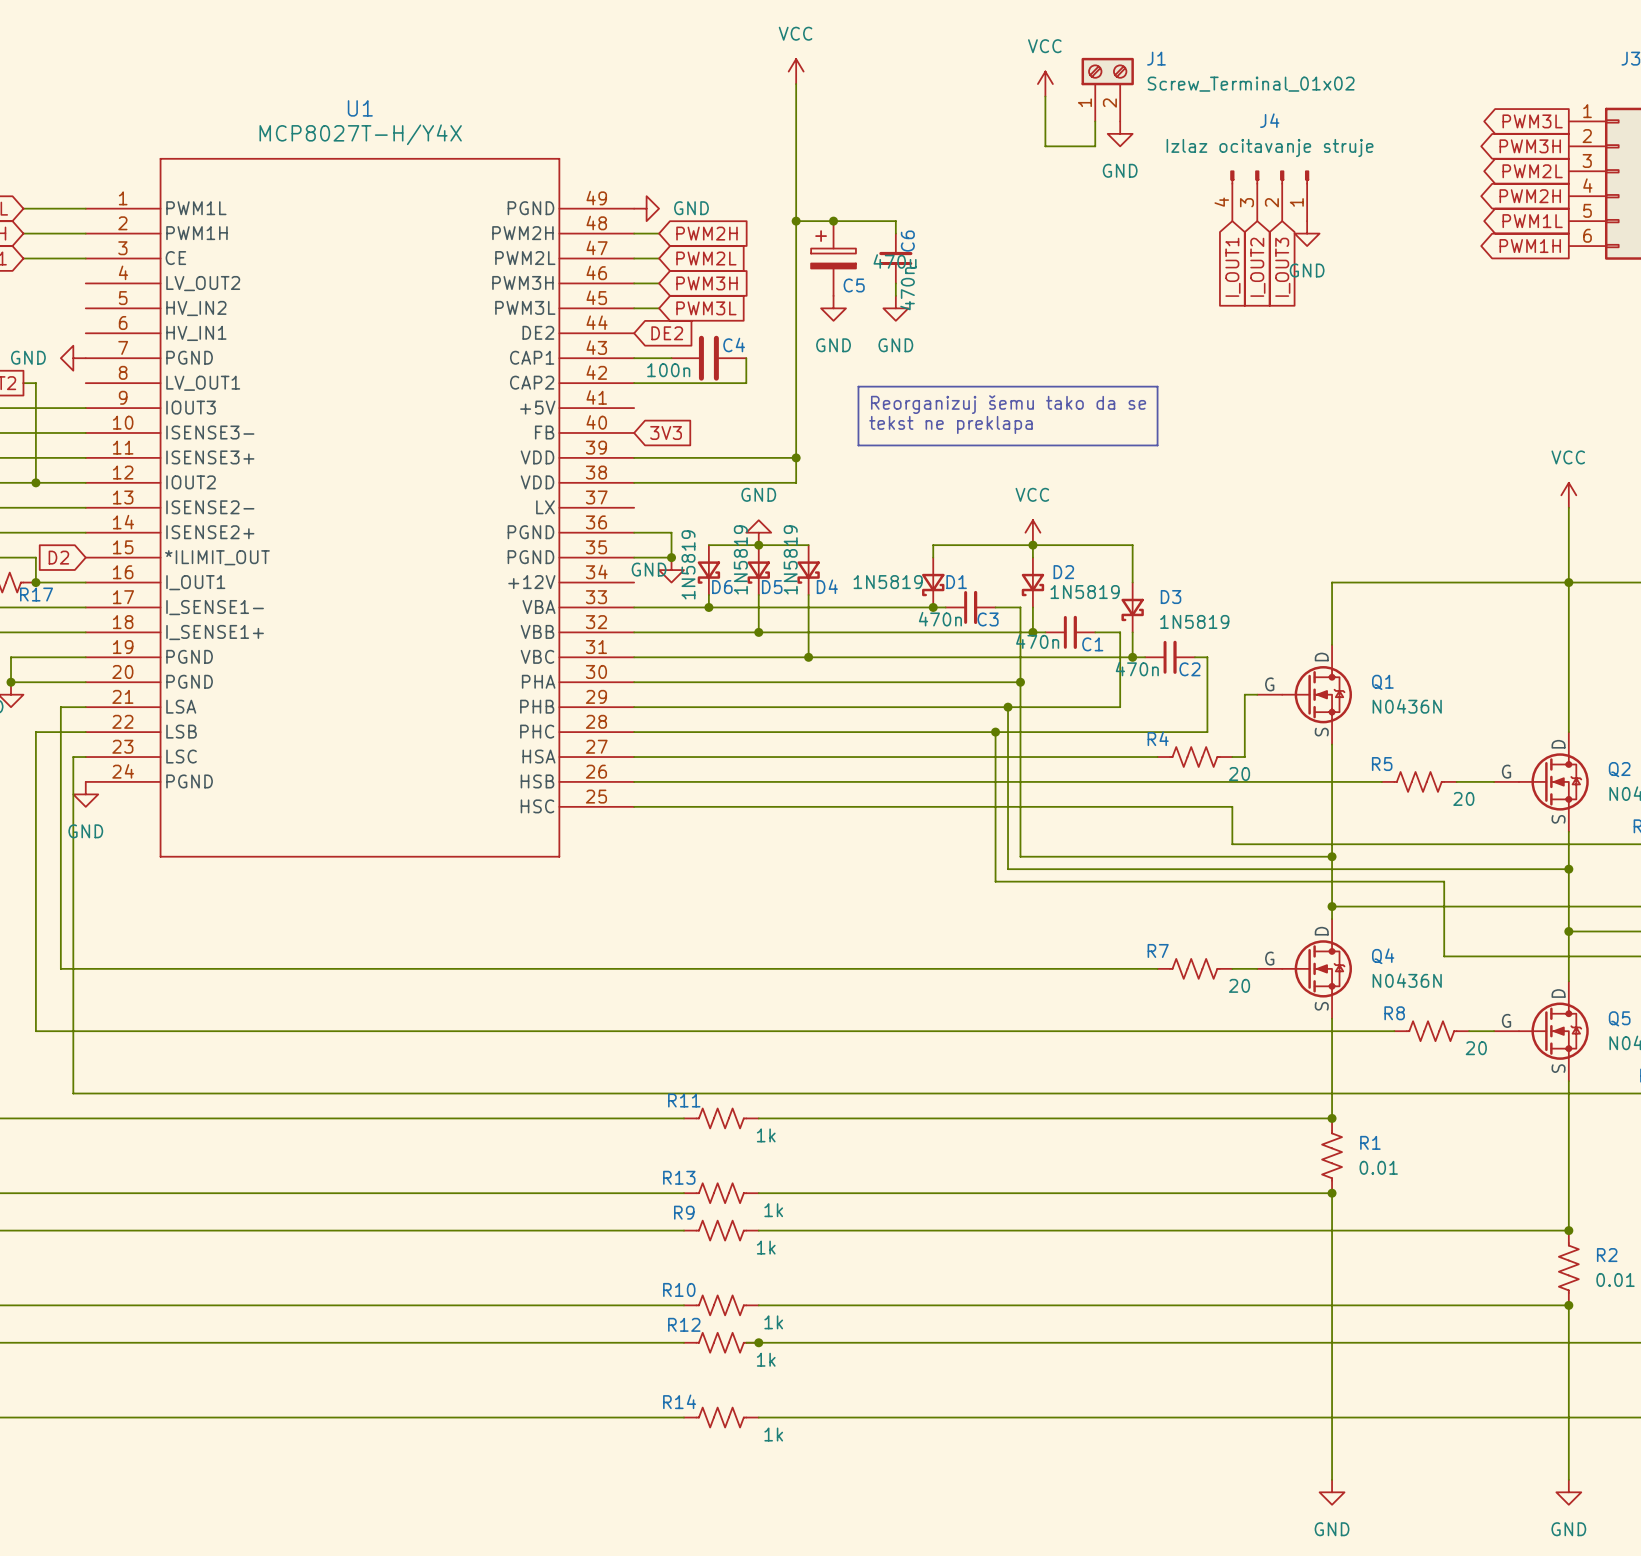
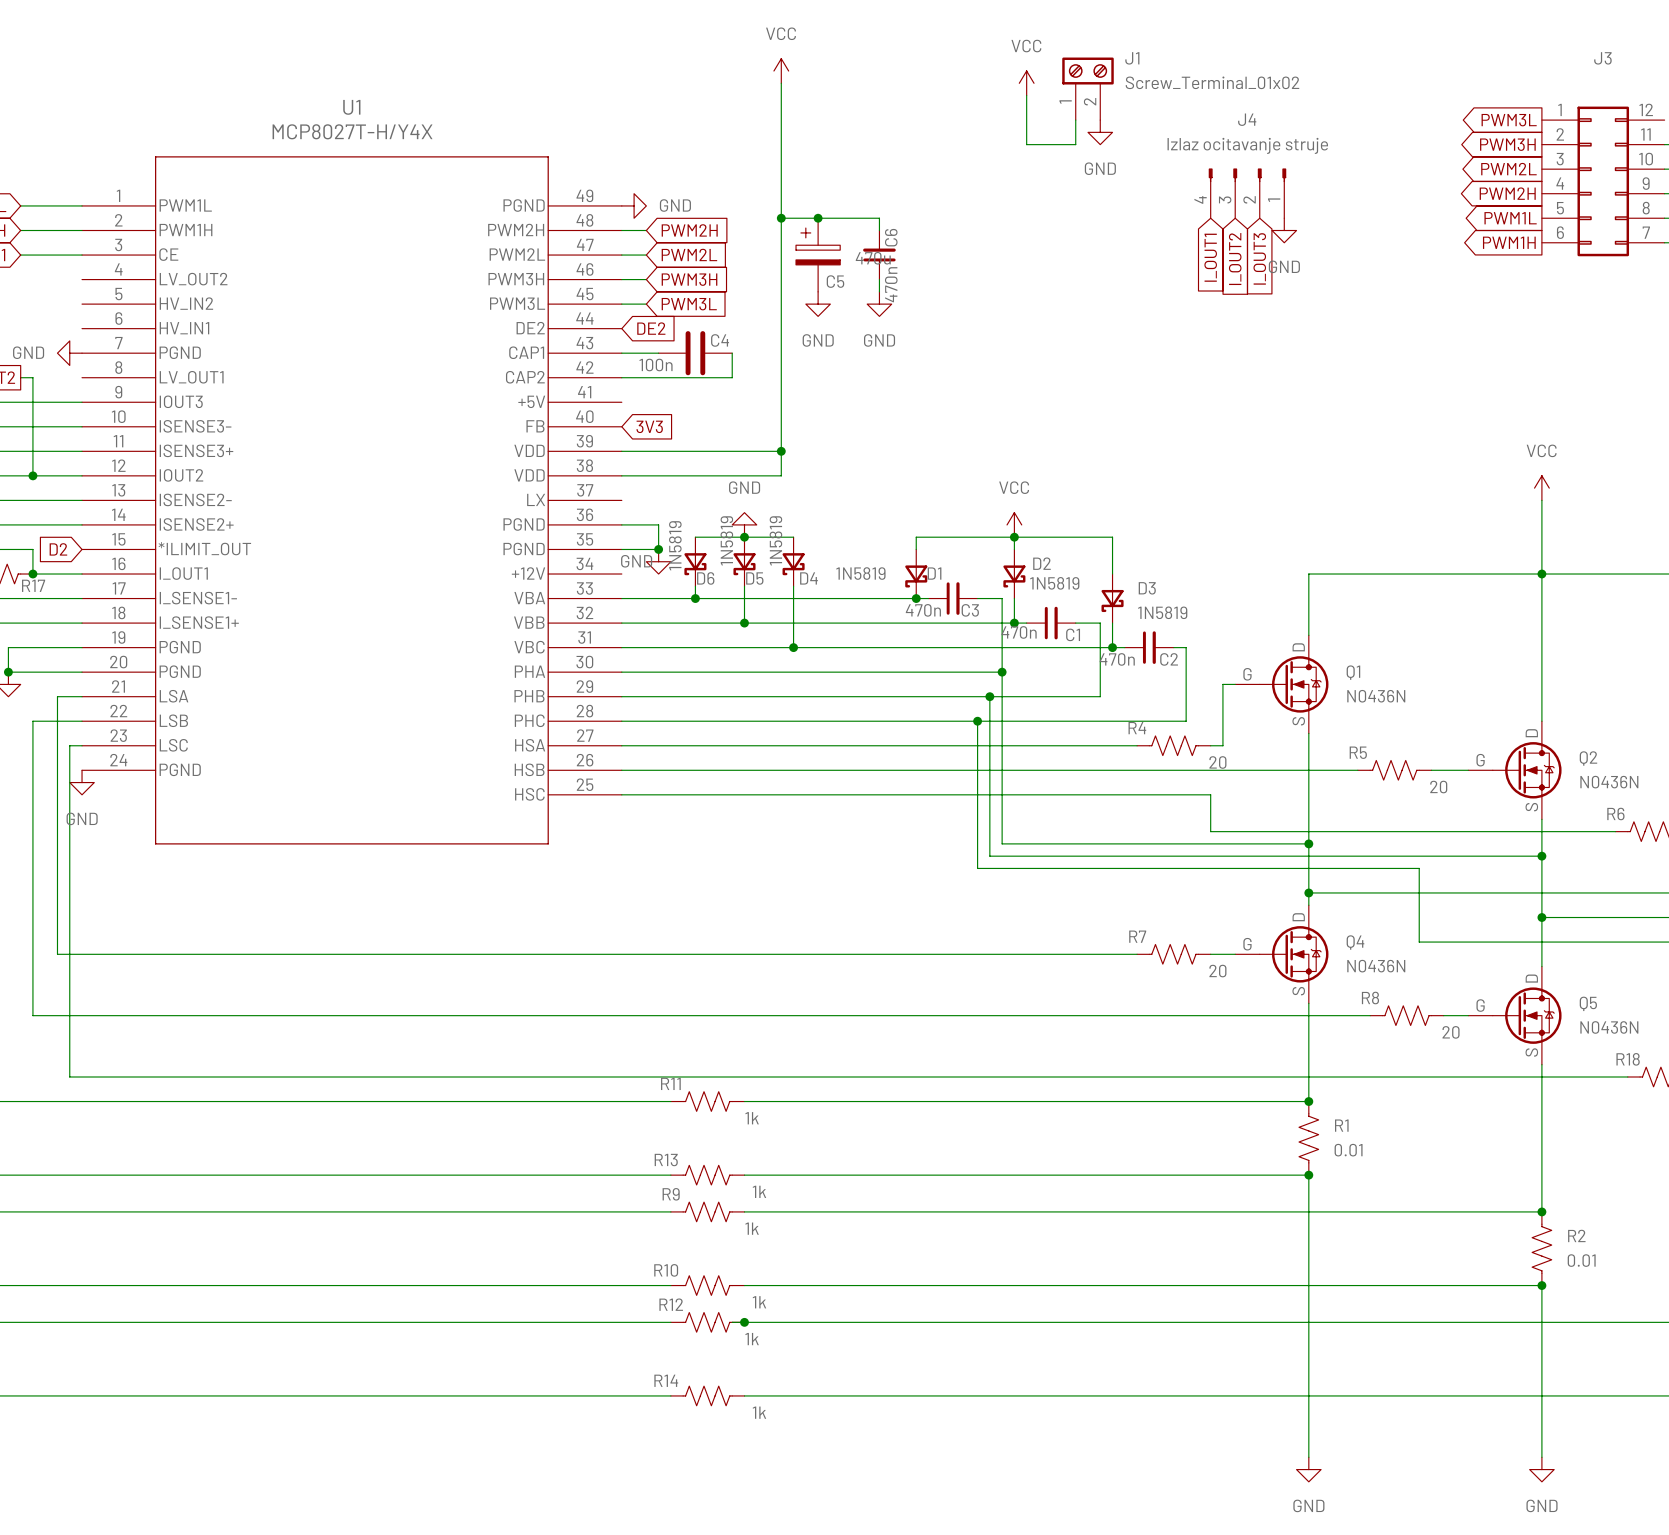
line: (858, 386) (1157, 386) (1157, 445) (858, 445) (858, 386) -> none
text: Reorganizuj šemu tako da se (1008, 404) -> none
text: tekst ne preklapa (950, 424) -> none

